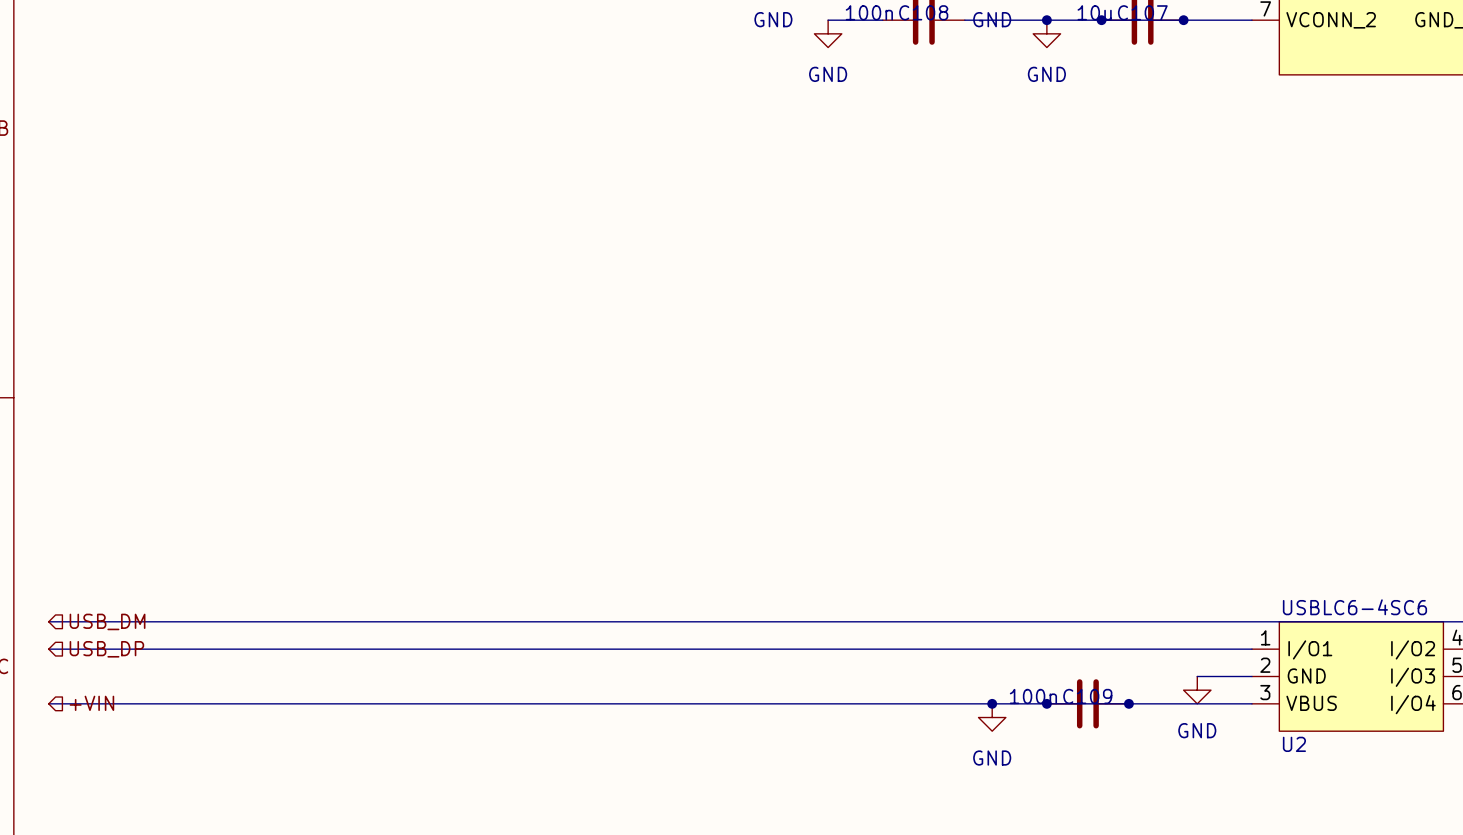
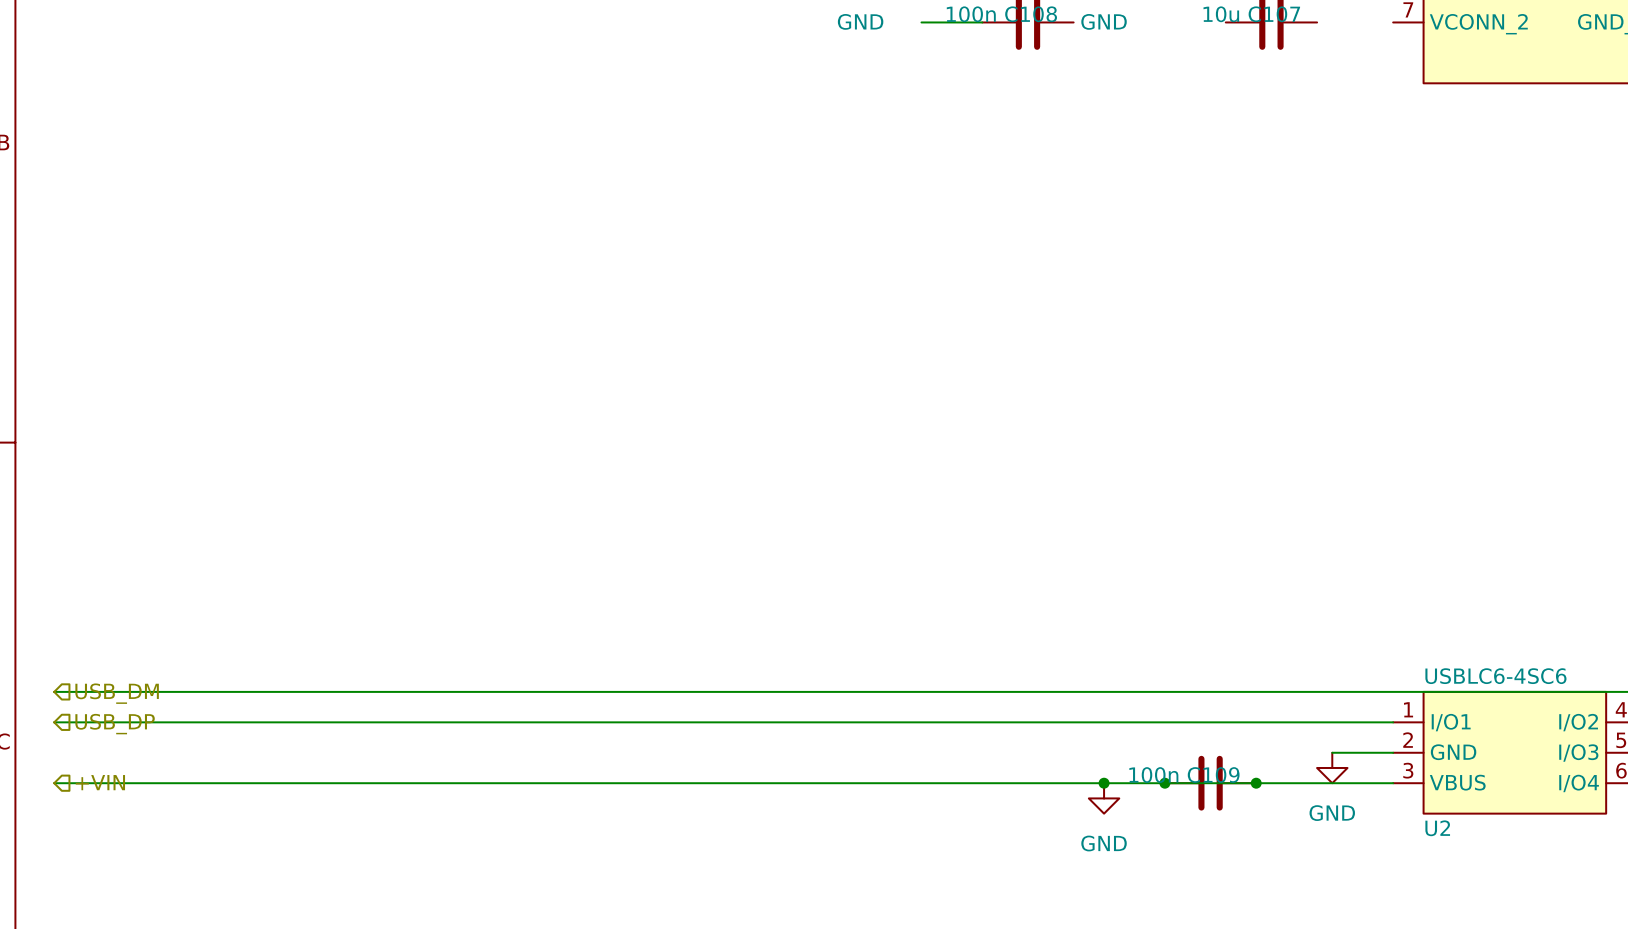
wire: (964, 20) (1251, 20) -> none
junction: (1046, 20) -> none
junction: (1101, 20) -> none
junction: (1183, 20) -> none
power symbol: GND (828, 33) -> none
power symbol: GND (1046, 33) -> none

